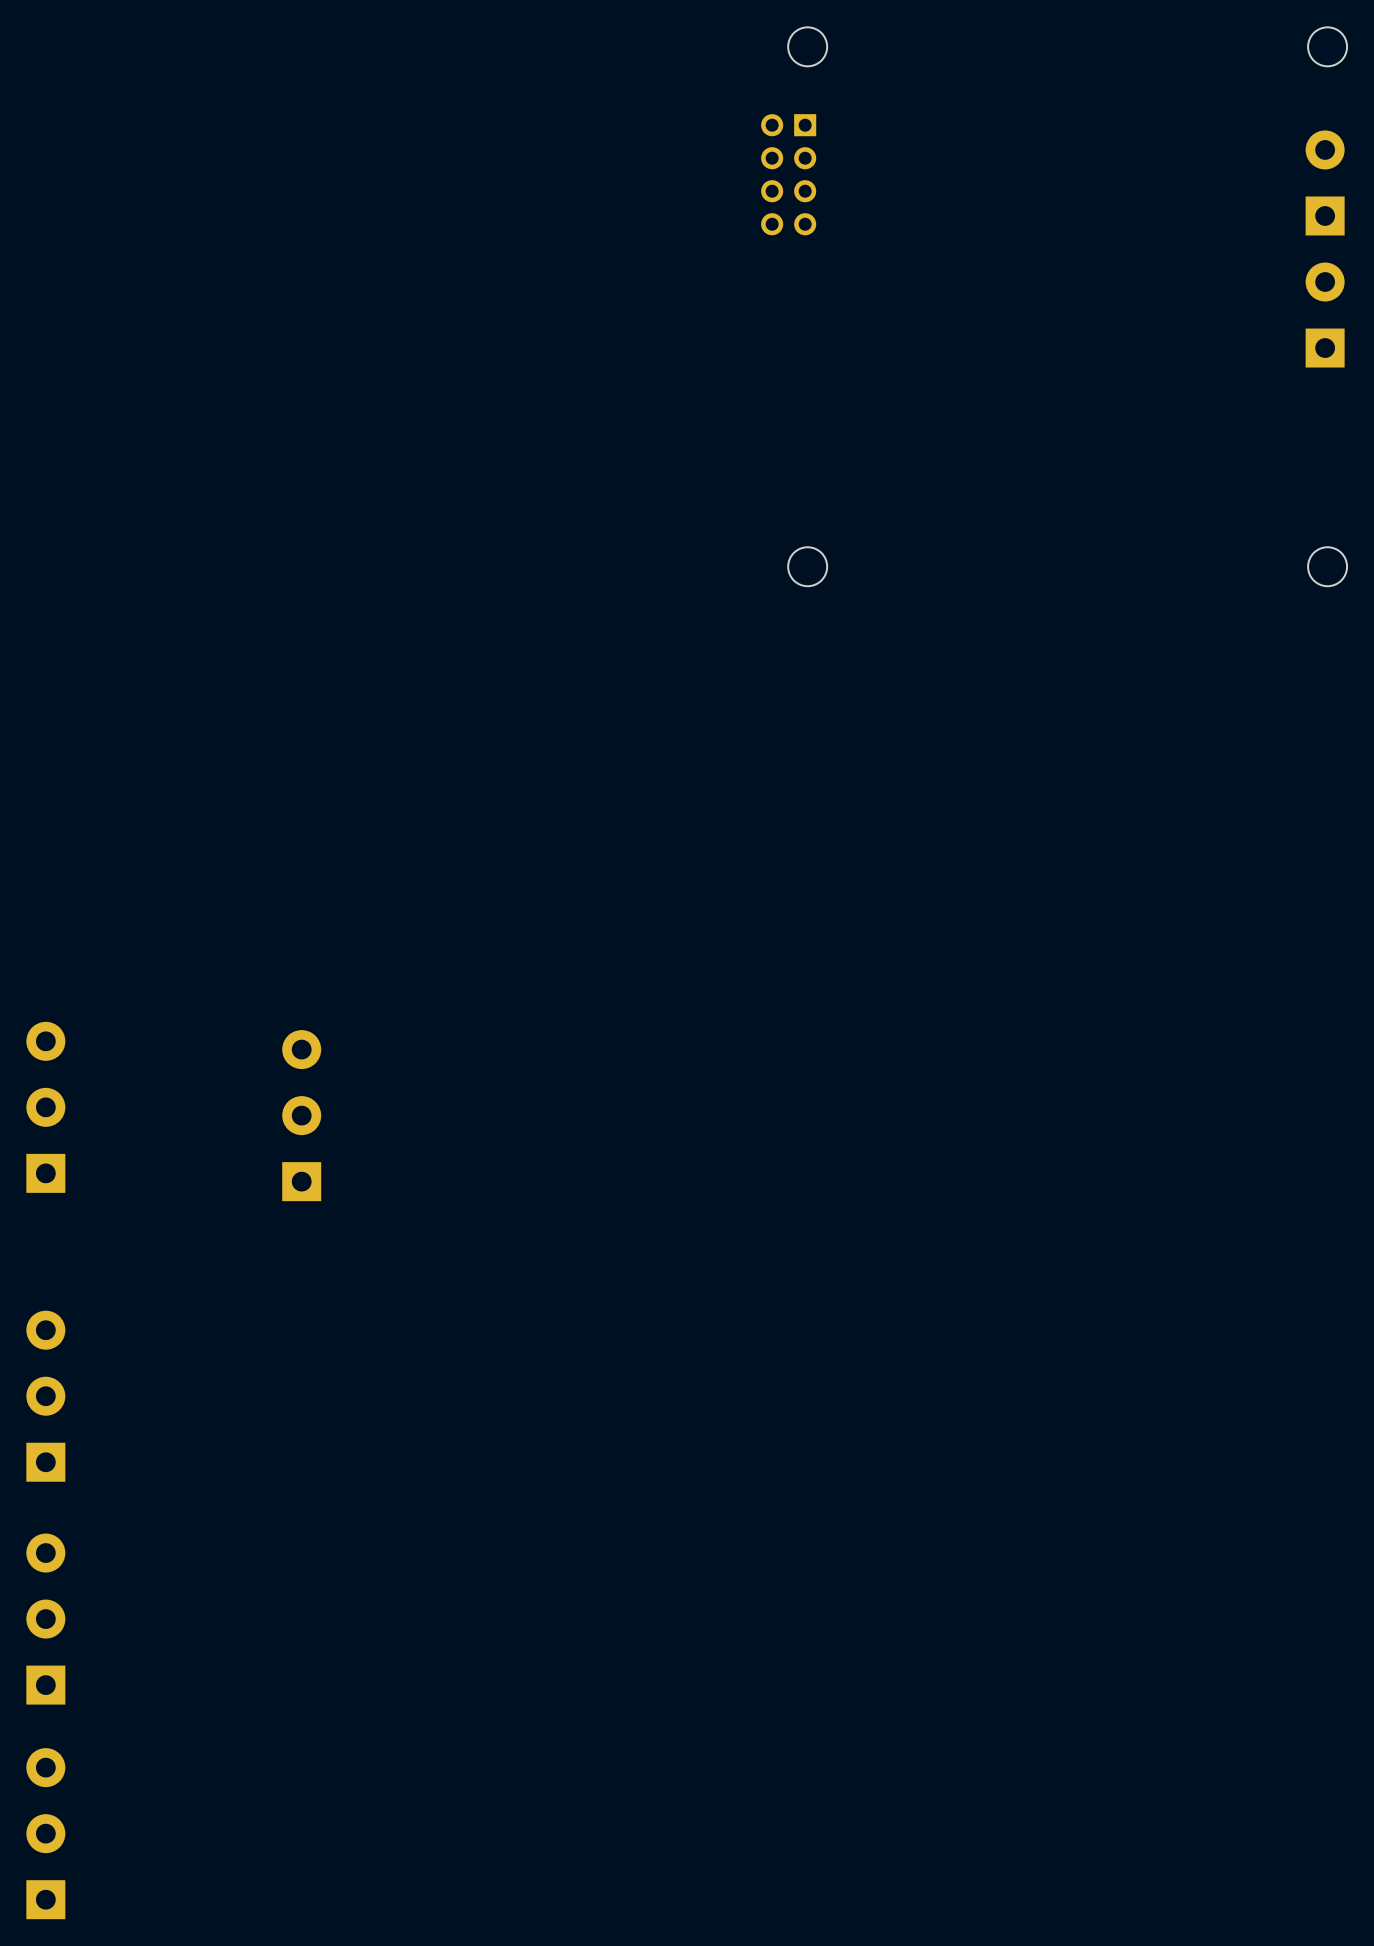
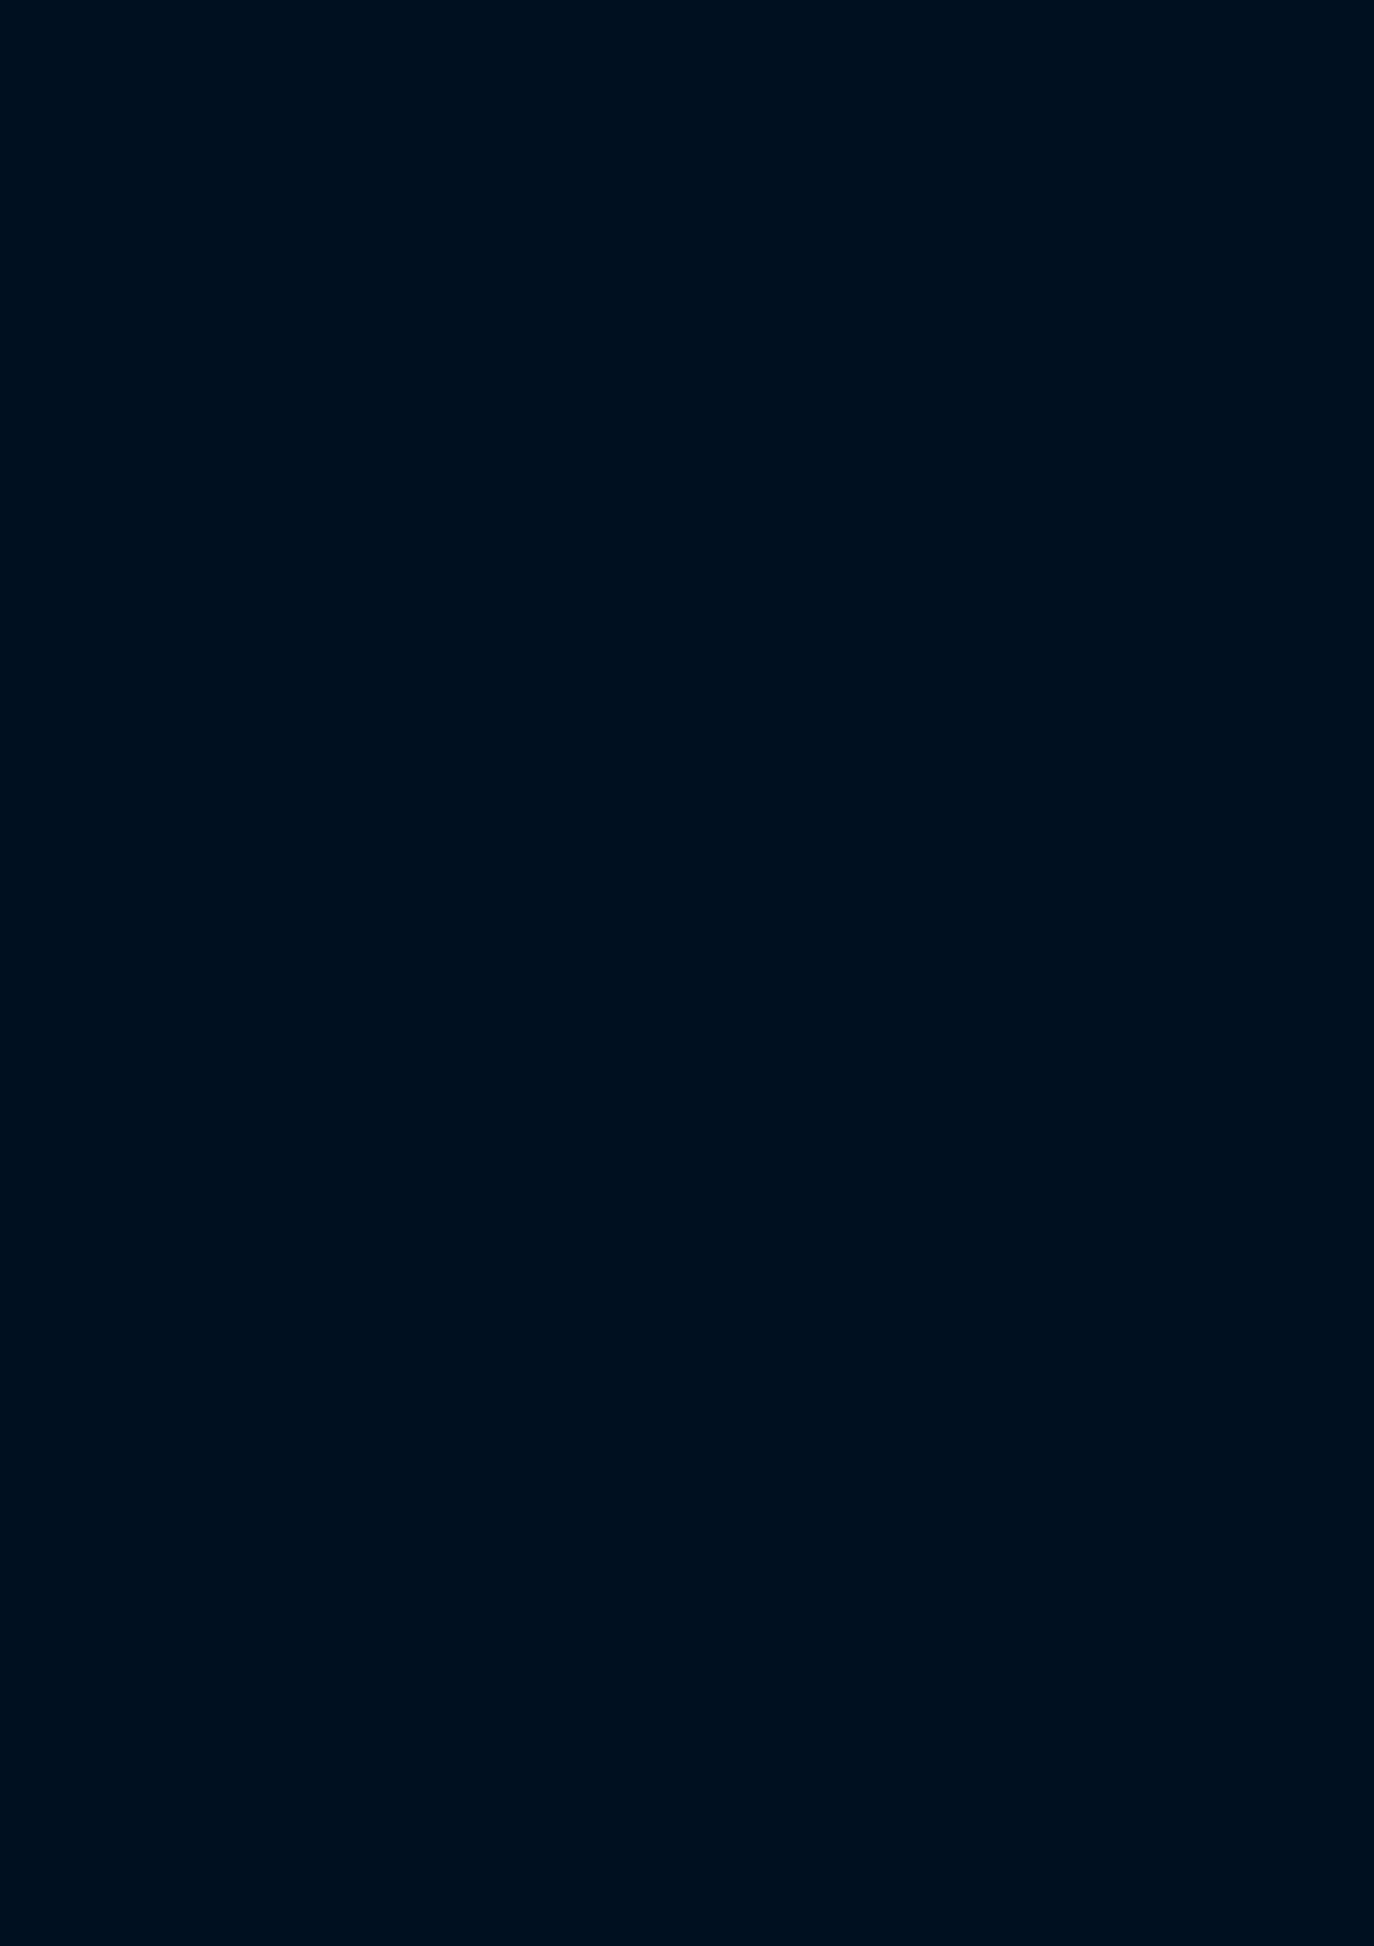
round board edge: [787, 26, 829, 68] -> none
round board edge: [1307, 26, 1349, 68] -> none
part: (788, 174) -> none
part: (1325, 182) -> none
part: (1325, 315) -> none
round board edge: [787, 546, 829, 588] -> none
round board edge: [1307, 546, 1349, 588] -> none
part: (45, 1107) -> none
part: (301, 1115) -> none
part: (45, 1396) -> none
part: (45, 1619) -> none
part: (45, 1833) -> none

